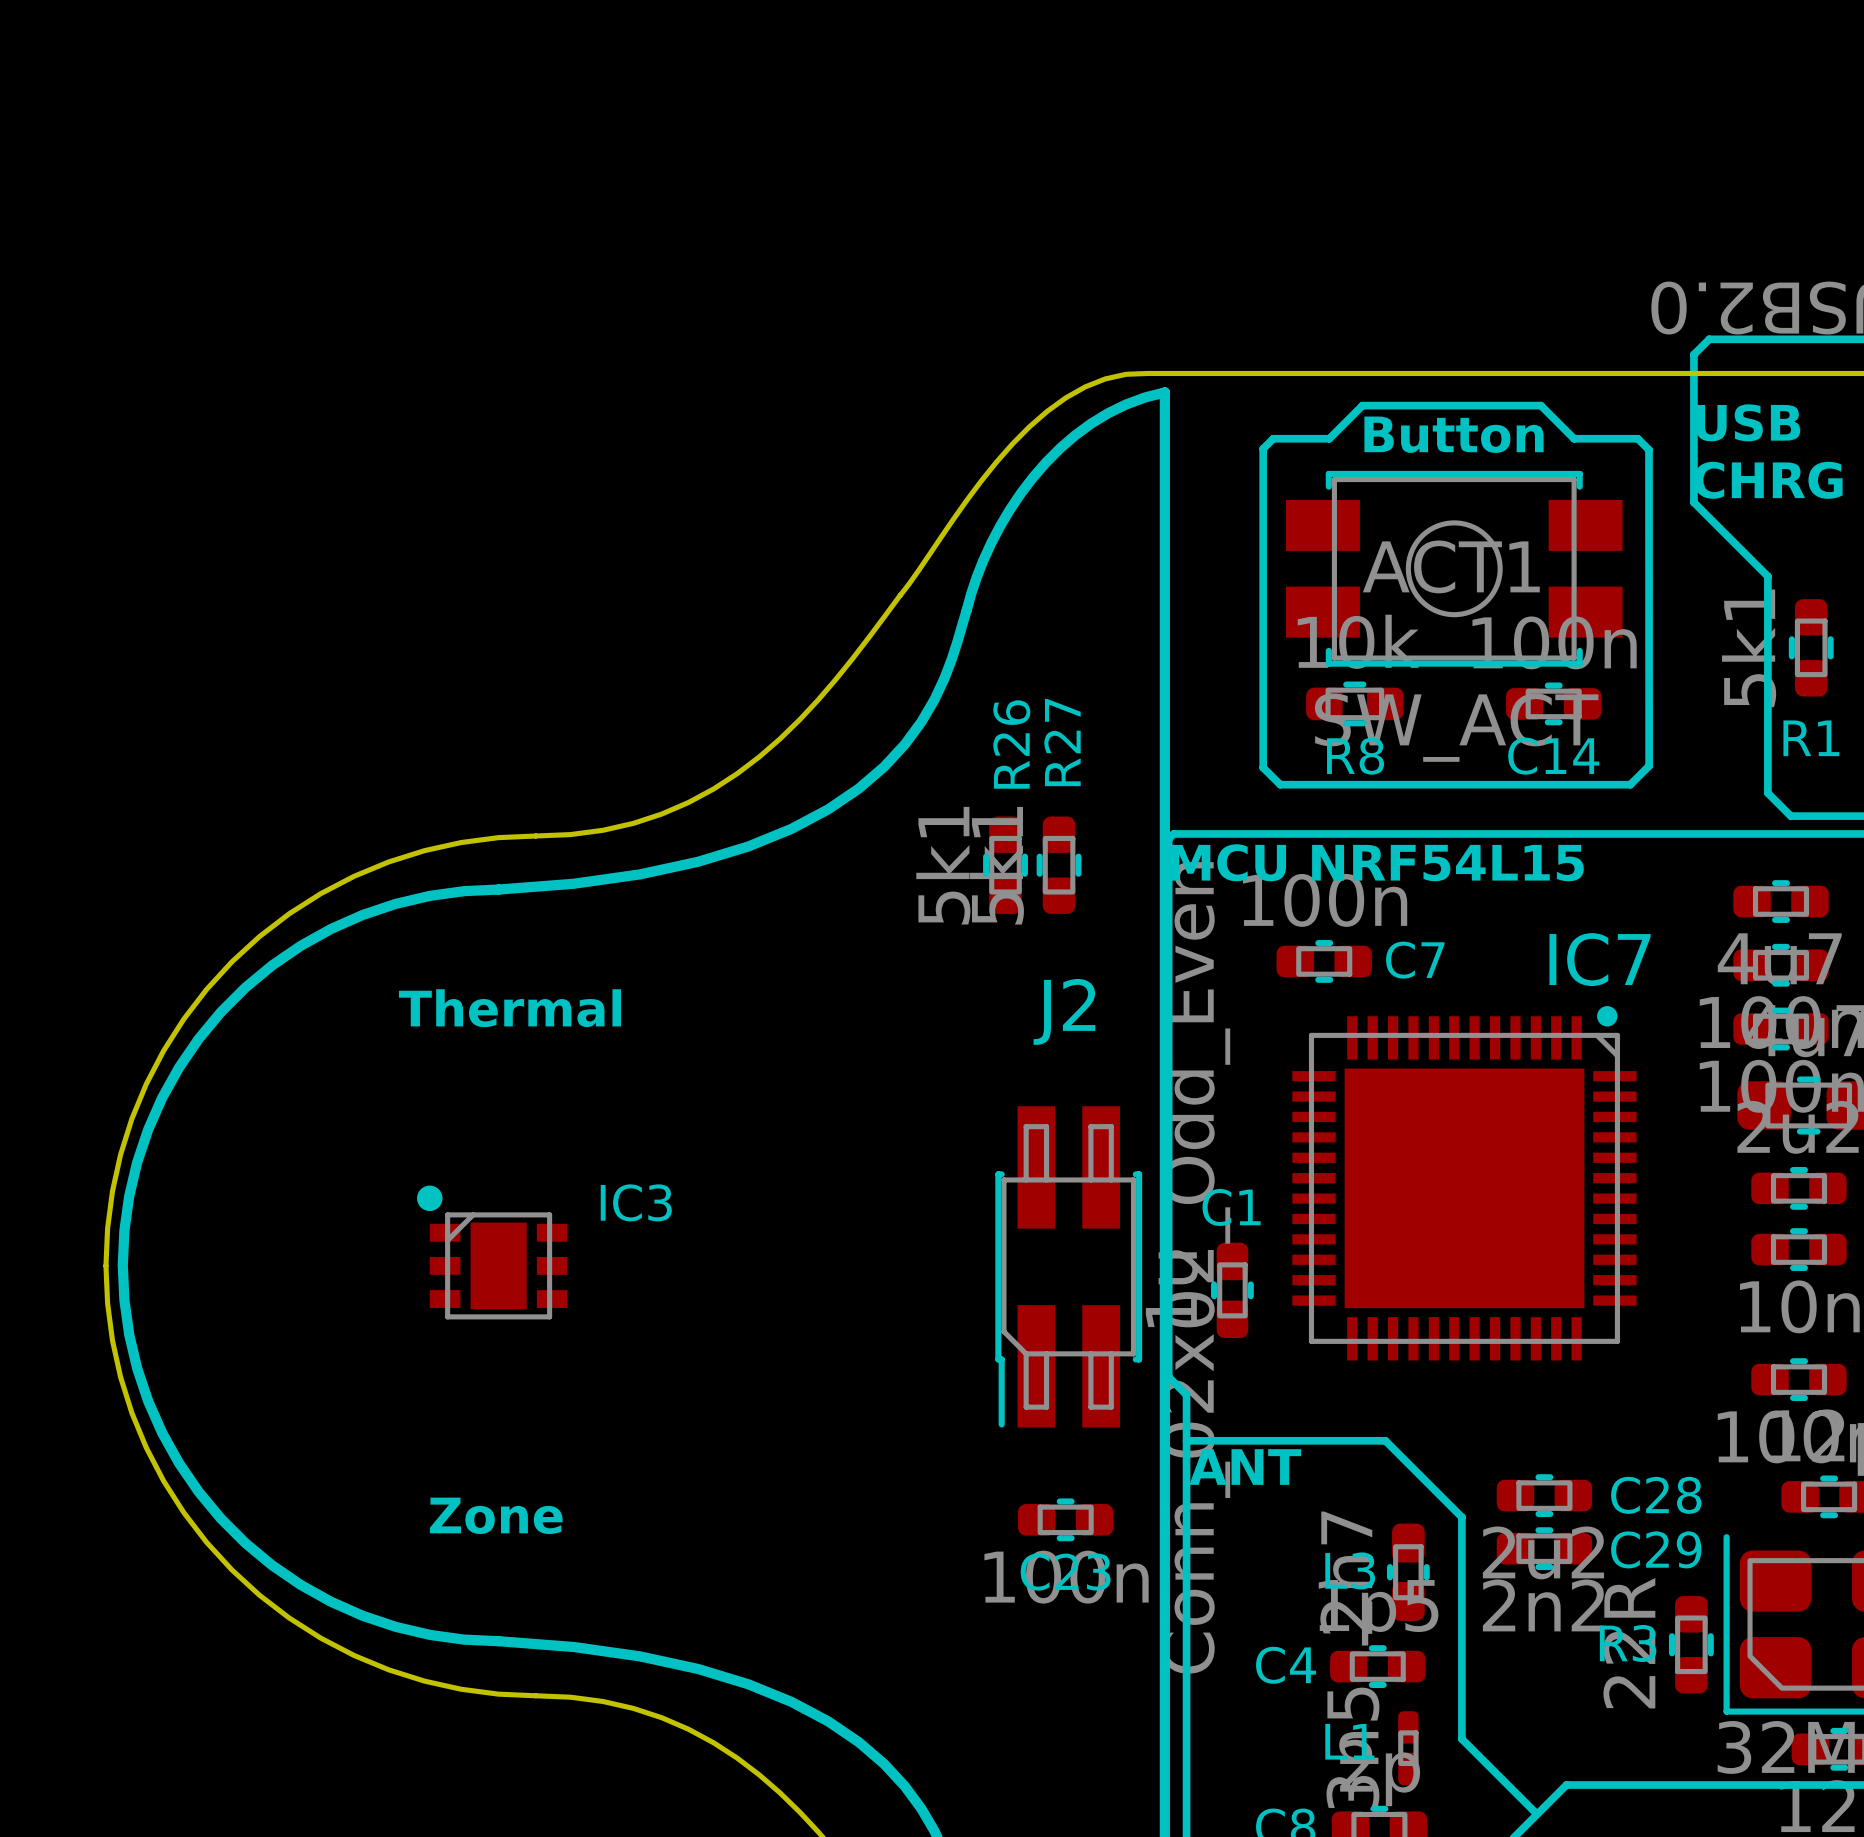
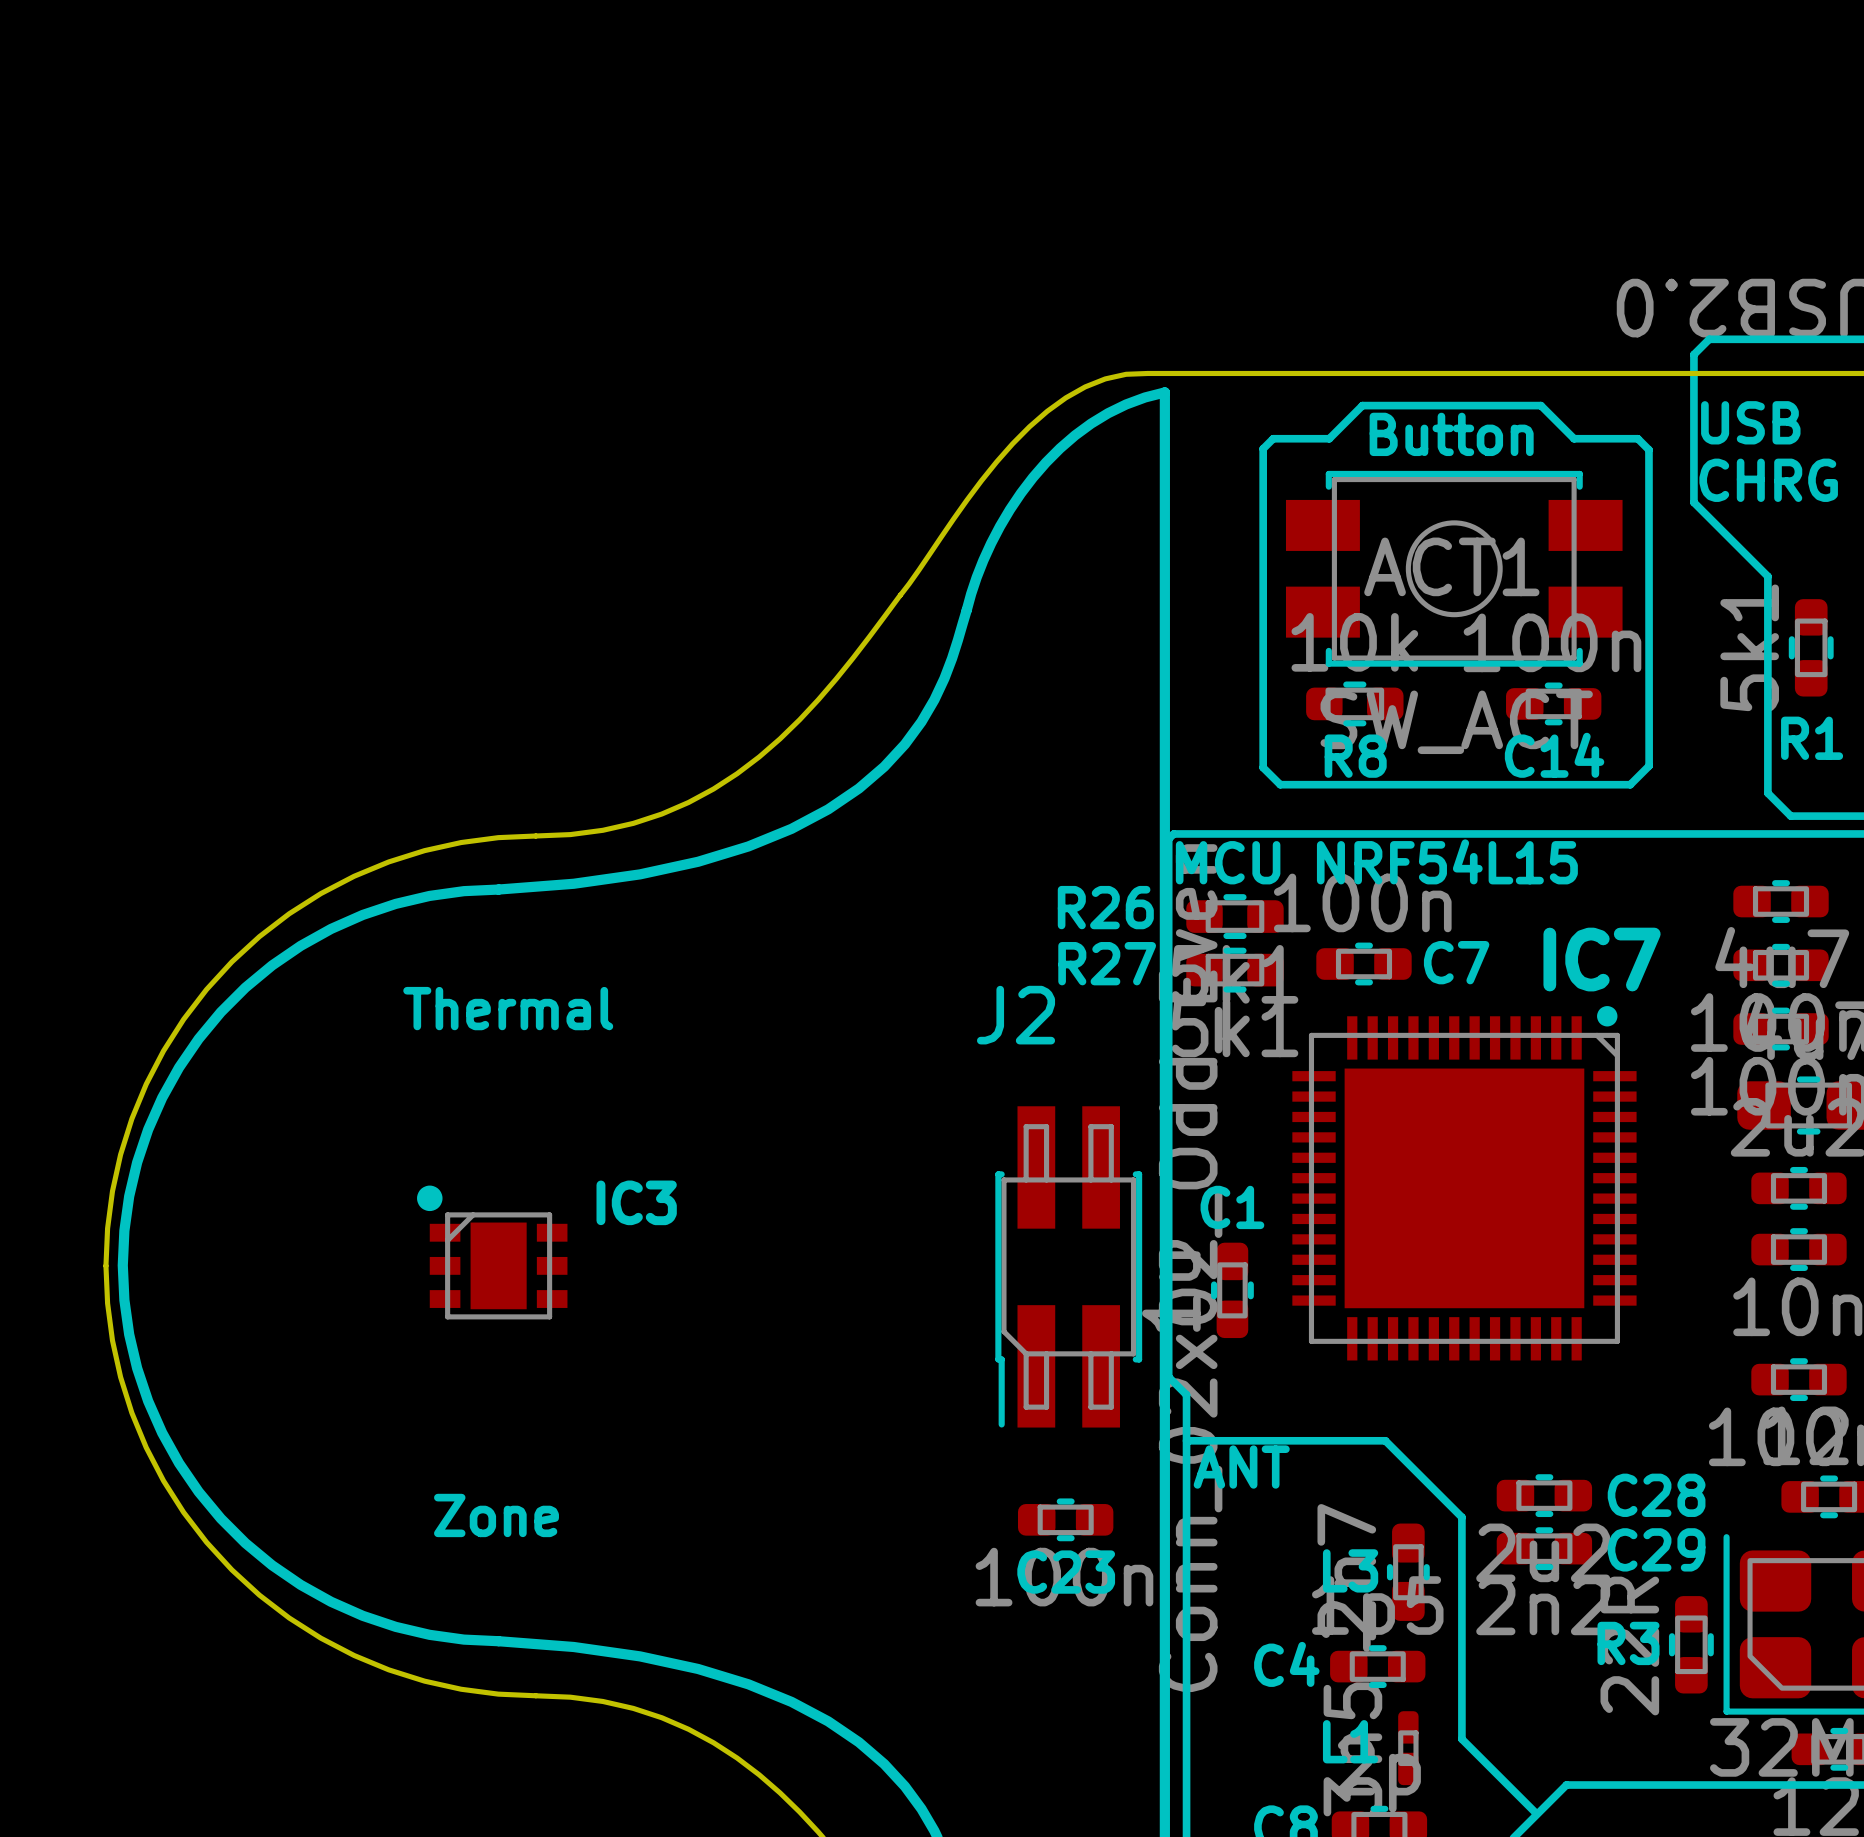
R27 name position: R27 (1062, 742) -> R27 (1107, 963)
R26 name position: R26 (1011, 744) -> R26 (1105, 907)
R26 rotation: 0° (1005, 865) -> 90° clockwise (1234, 916)
R26 position: (1005, 865) -> (1234, 916)
R27 rotation: 0° (1059, 865) -> 90° clockwise (1234, 970)
R27 position: (1059, 865) -> (1234, 970)
C7 position: (1324, 961) -> (1364, 963)
J2 name position: J2 (1064, 1011) -> J2 (1016, 1015)

